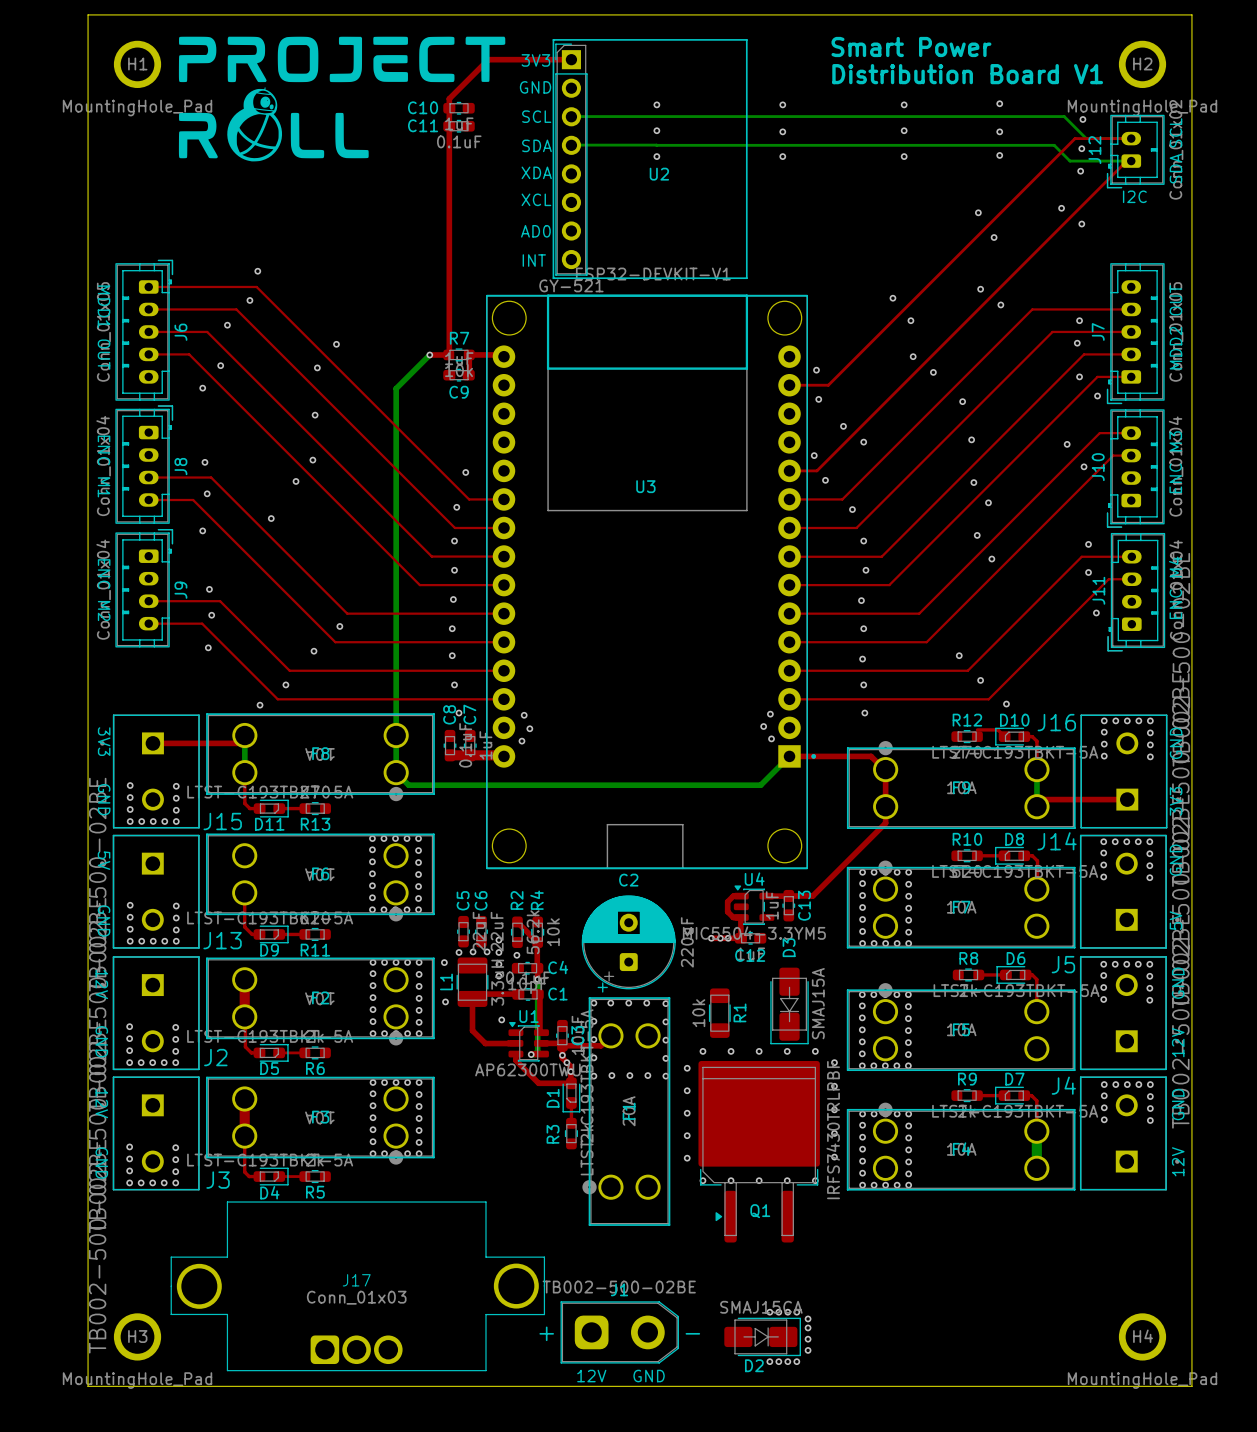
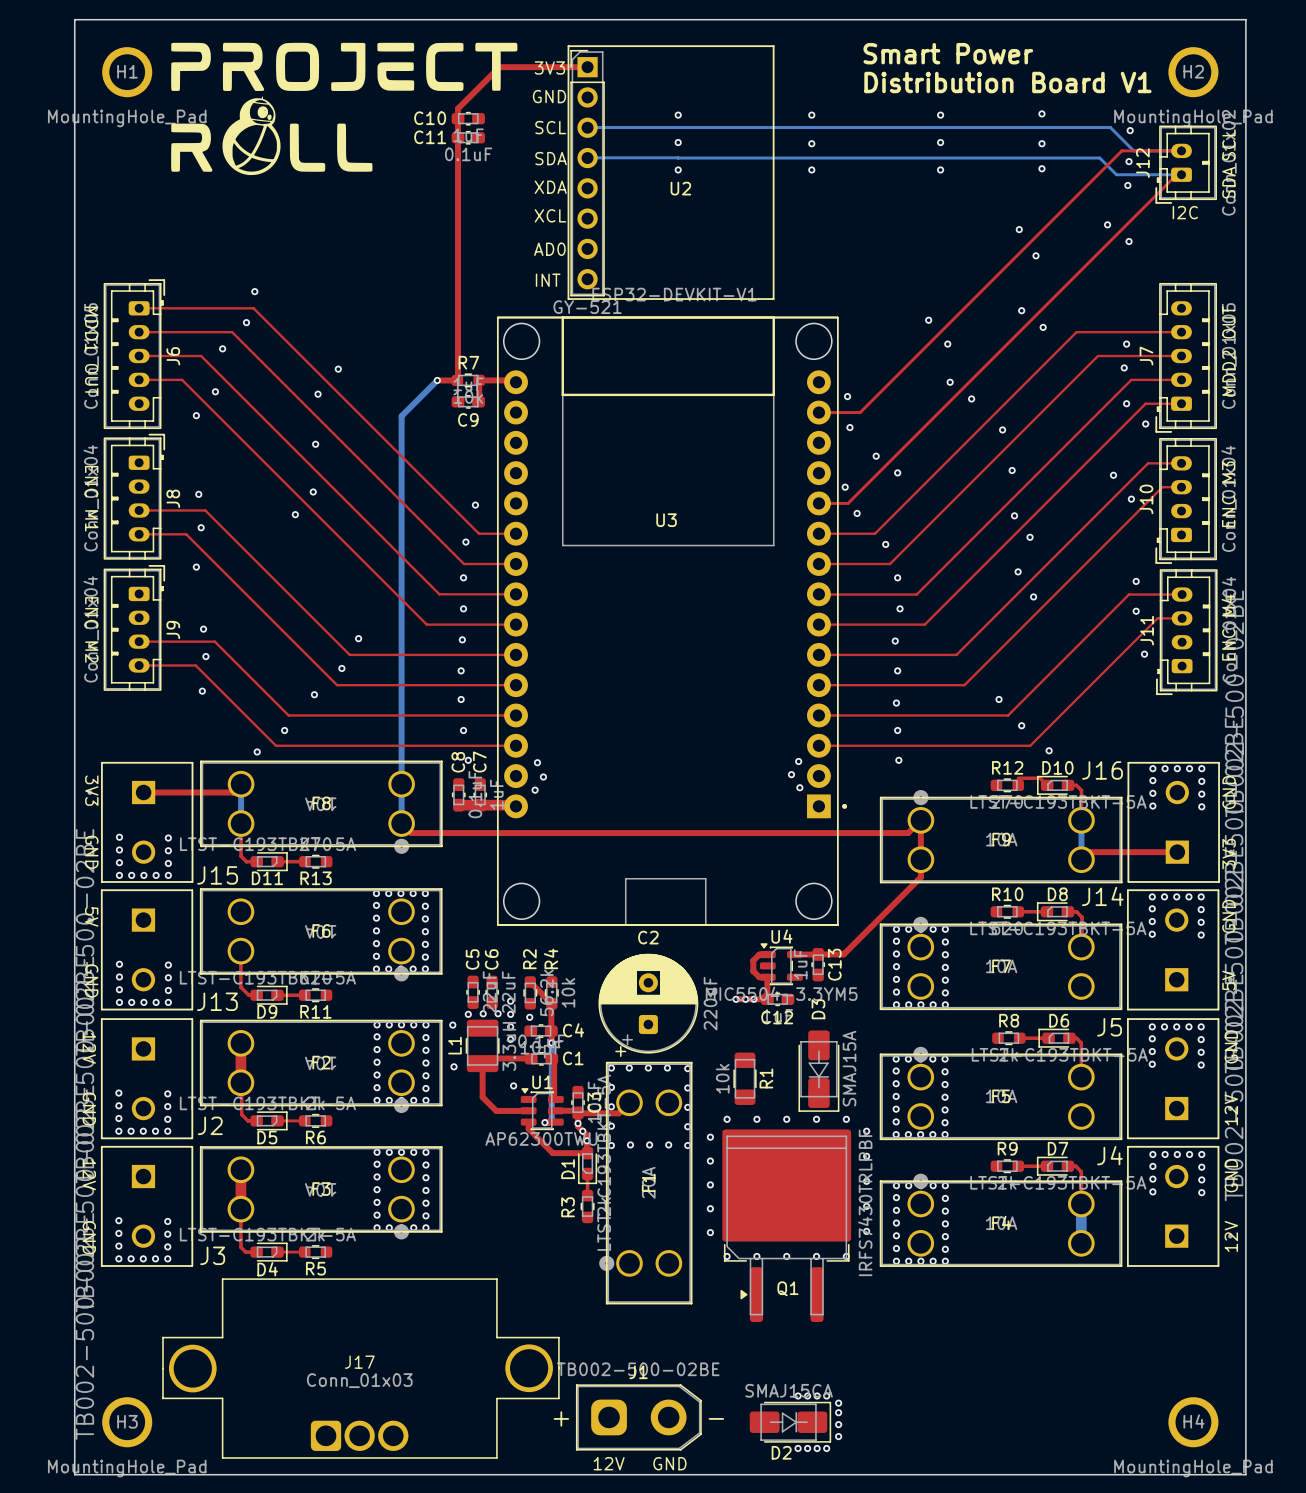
via: (271, 518) -> none
via: none -> (358, 638)
top track: (789, 756) (871, 756) (885, 769) -> (401, 823) (411, 833) (908, 833) (920, 820)
bottom track: (789, 756) (760, 785) (408, 785) (396, 772) -> none

